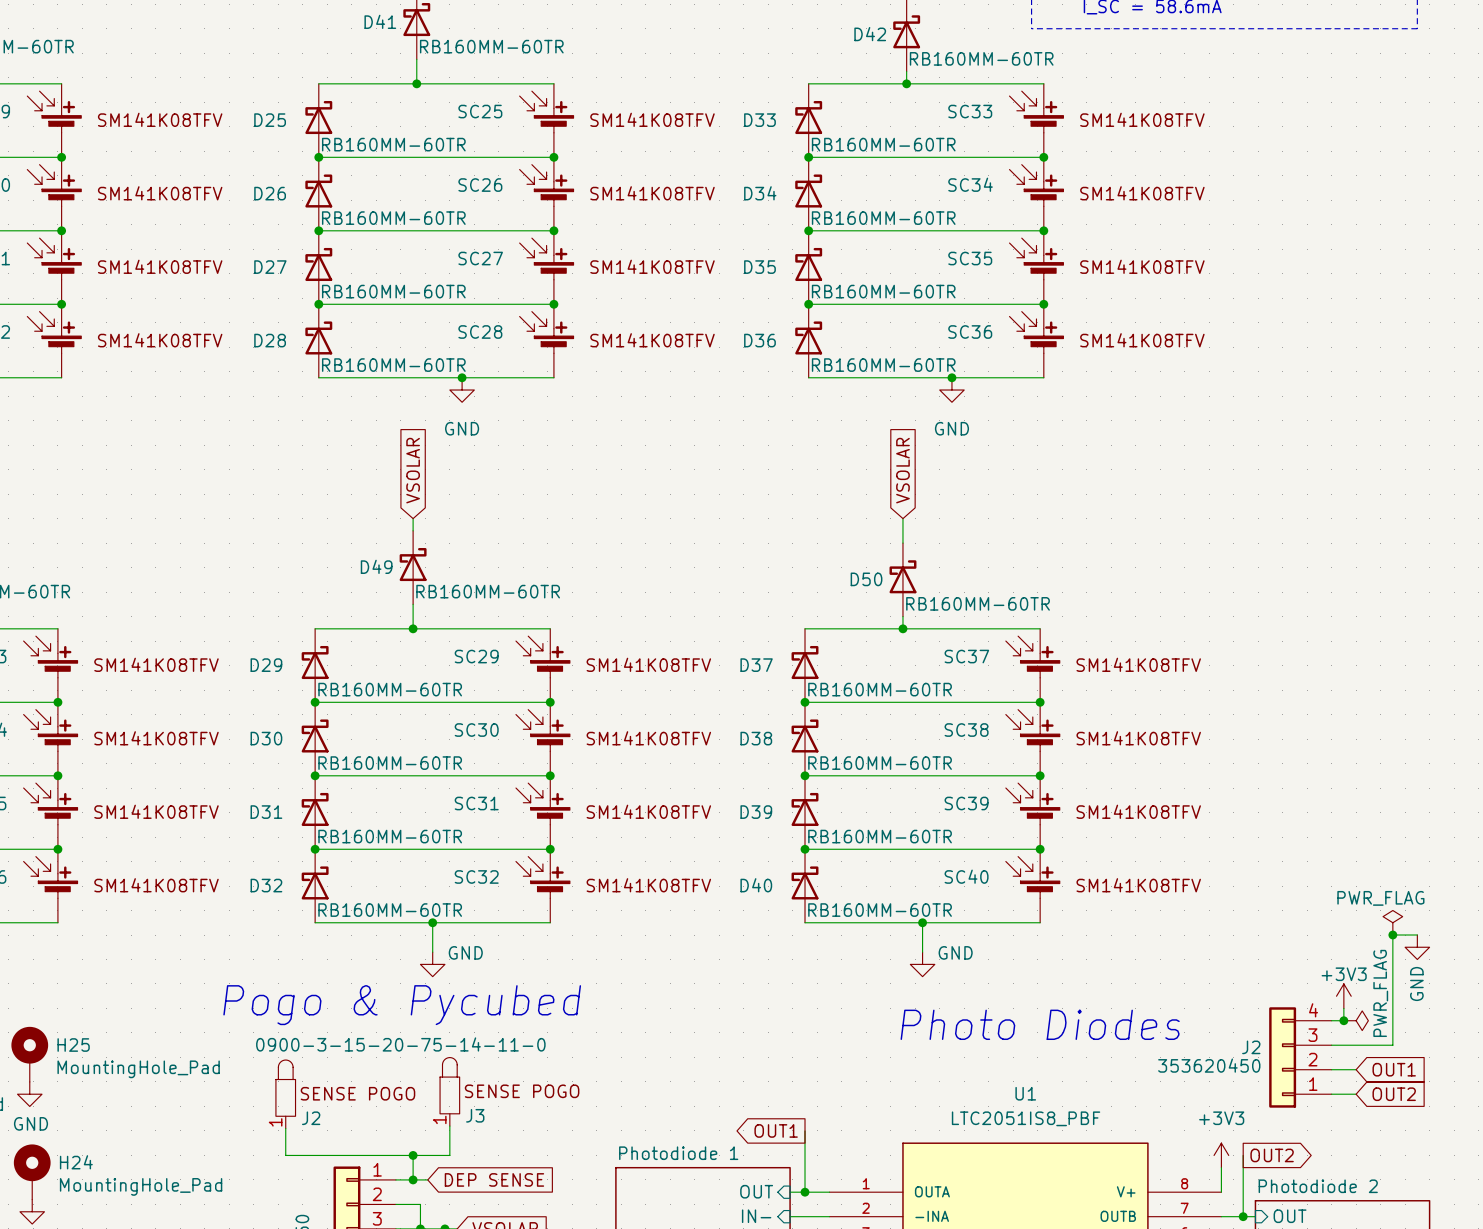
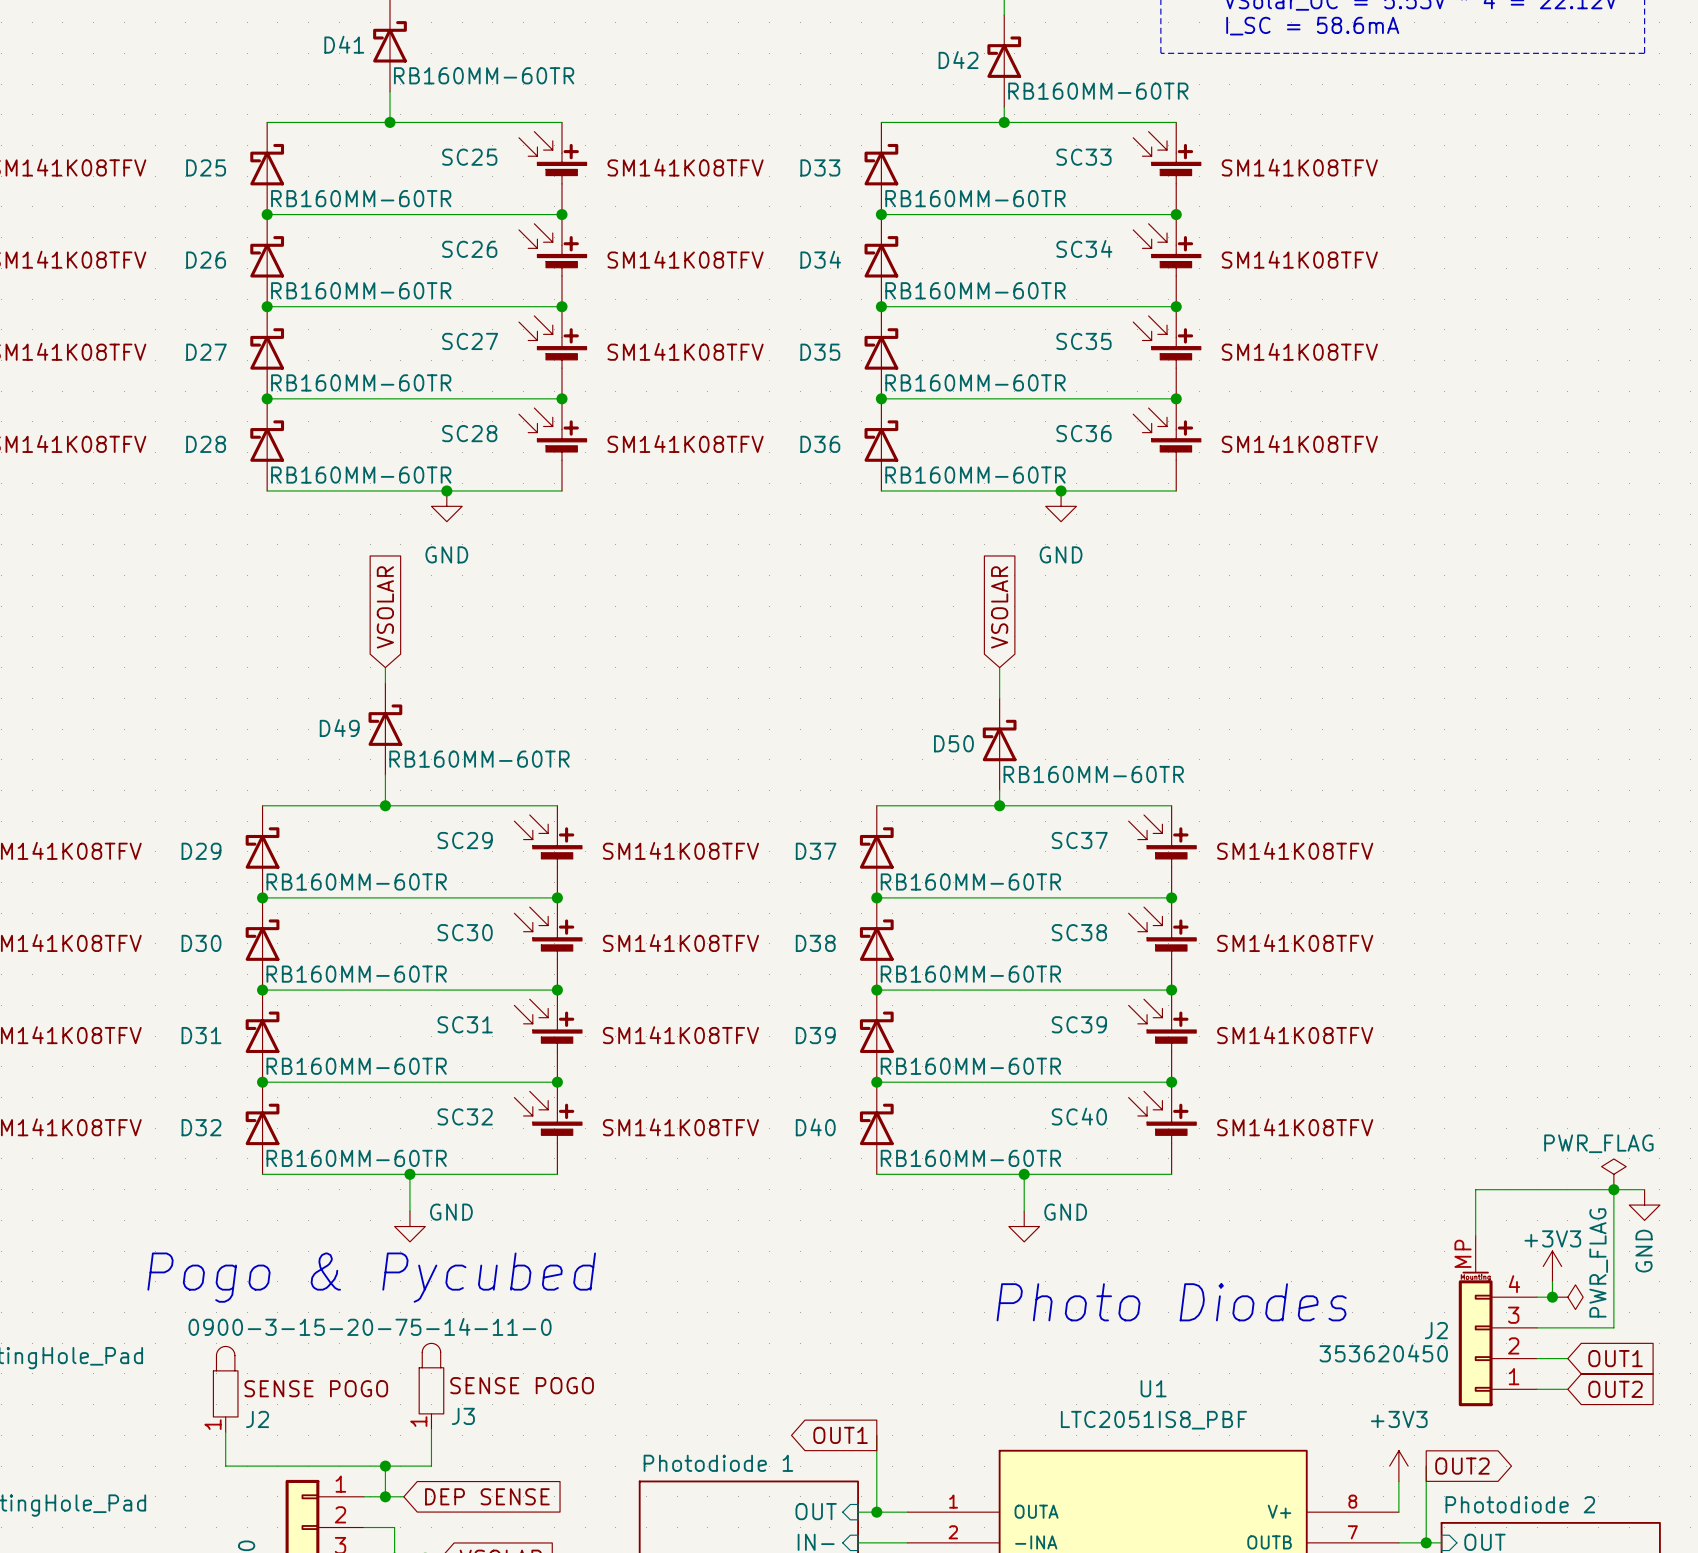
wire: none -> (1613, 1189) (1475, 1189) (1475, 1235)
J2: none -> 353620450 (1497, 1320)
J2: 353620450 (1300, 1057) -> none

